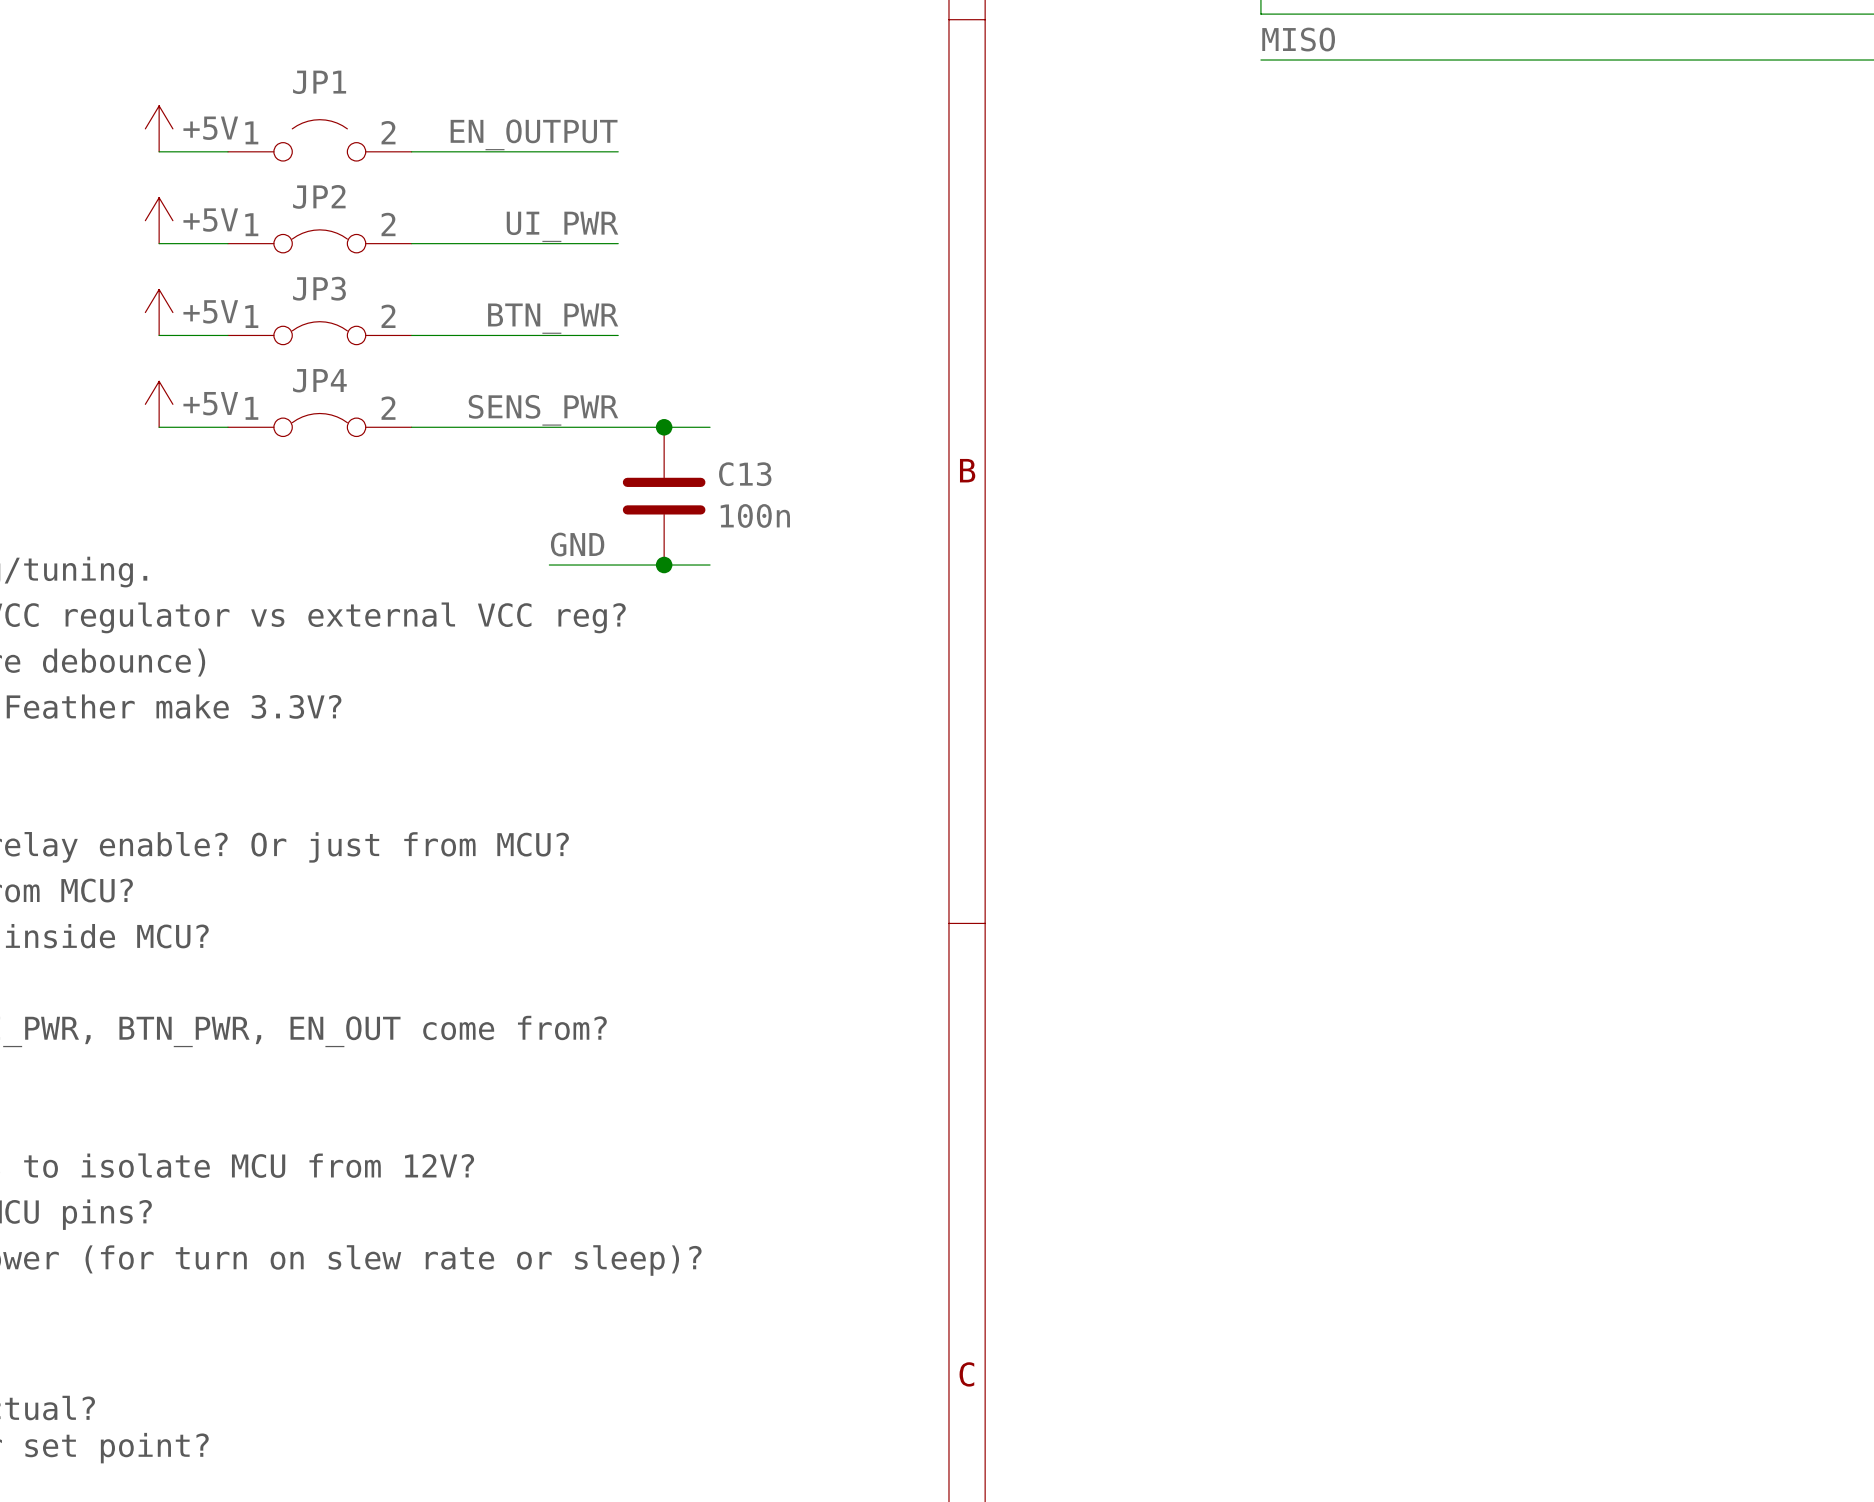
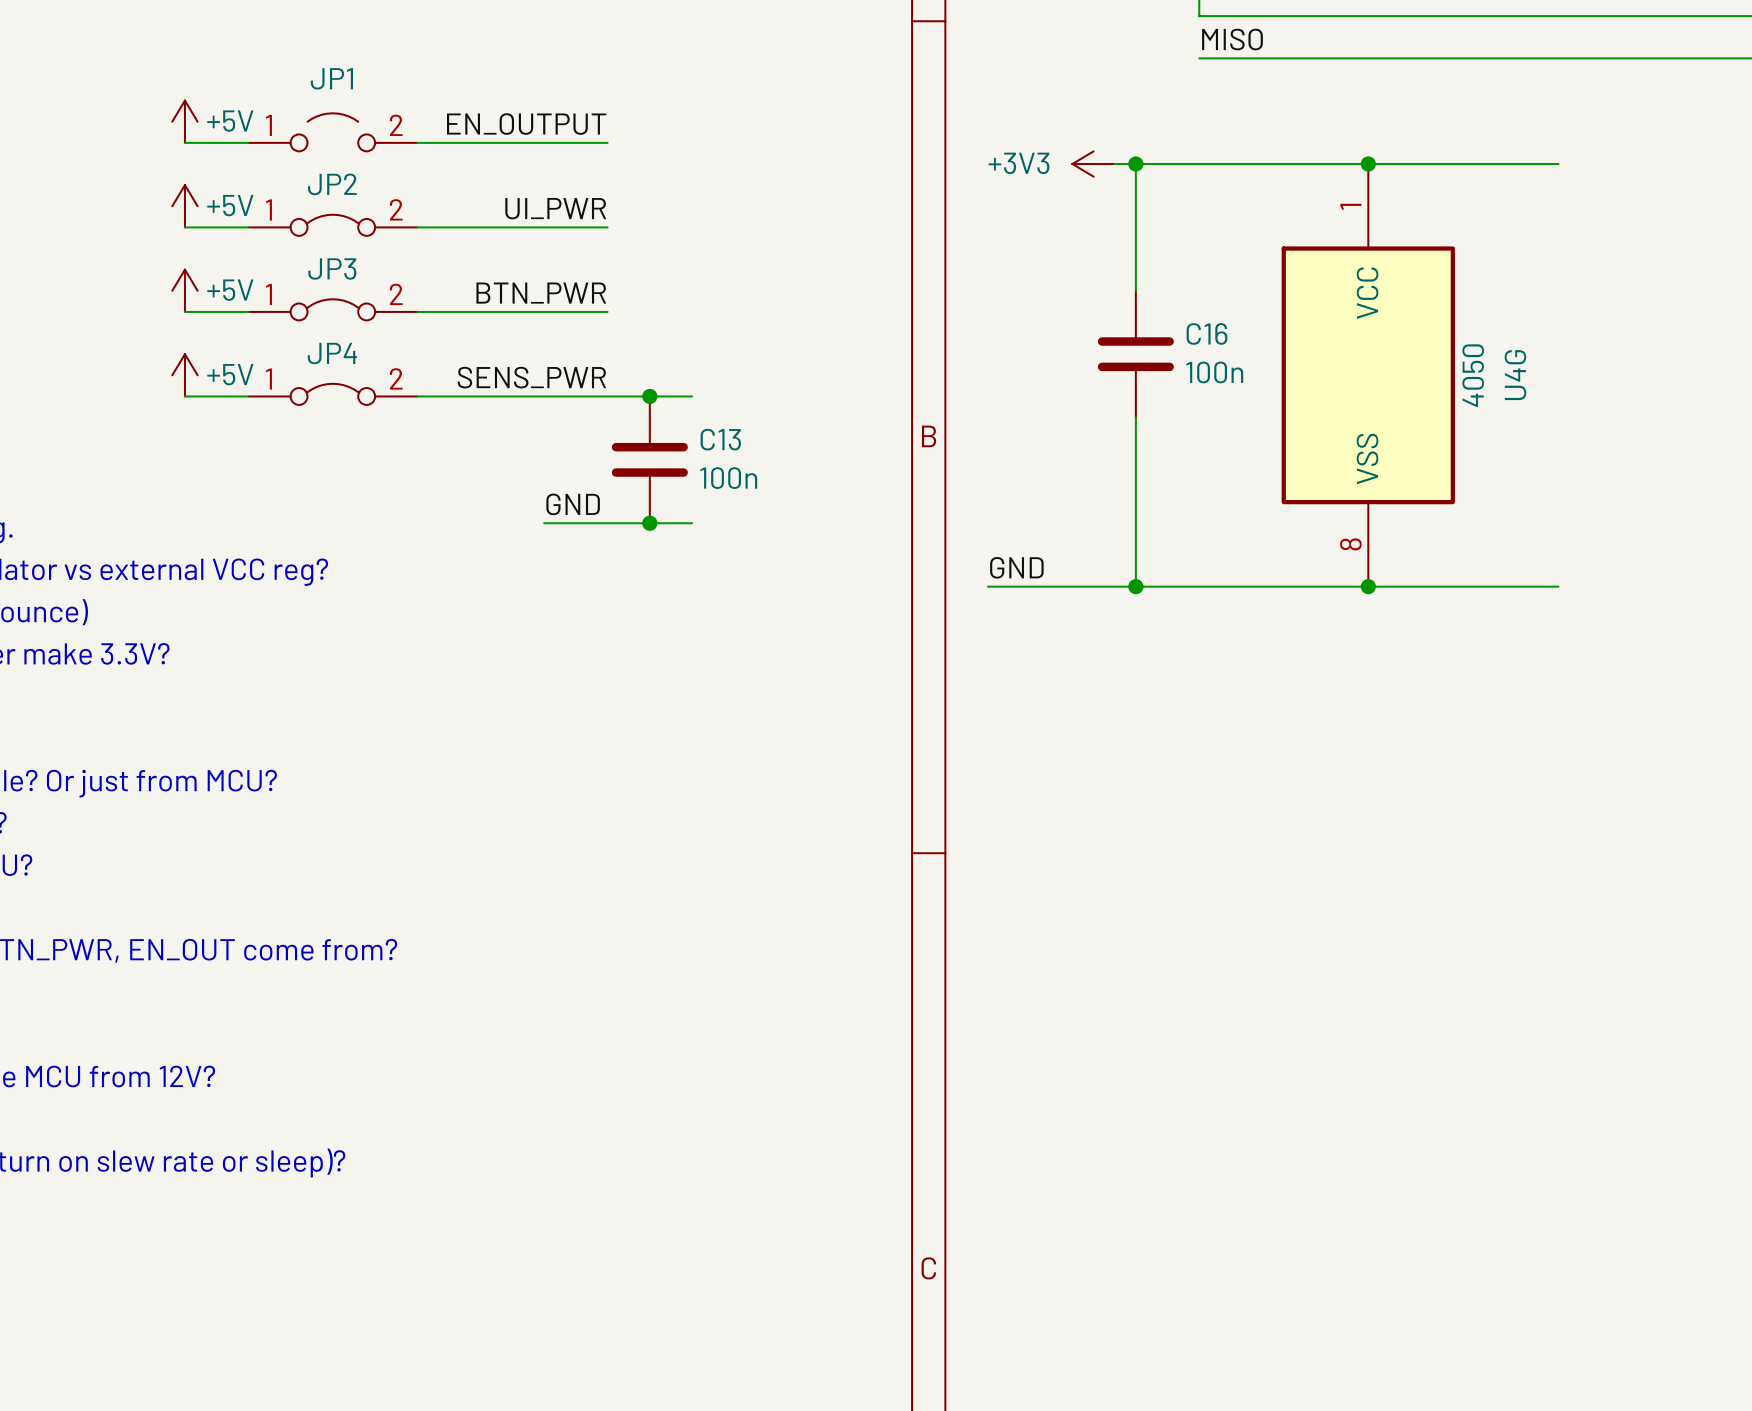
power symbol: none -> +3V3 (1093, 164)
wire: none -> (1114, 164) (1558, 164)
wire: none -> (1135, 164) (1135, 290)
junction: none -> (1135, 164)
junction: none -> (1368, 164)
C16: none -> 100n (1135, 354)
U4G: none -> 4050 (1368, 375)
wire: none -> (1135, 417) (1135, 586)
label: none -> GND (1016, 567)
wire: none -> (987, 586) (1558, 586)
junction: none -> (1135, 586)
junction: none -> (1368, 586)

